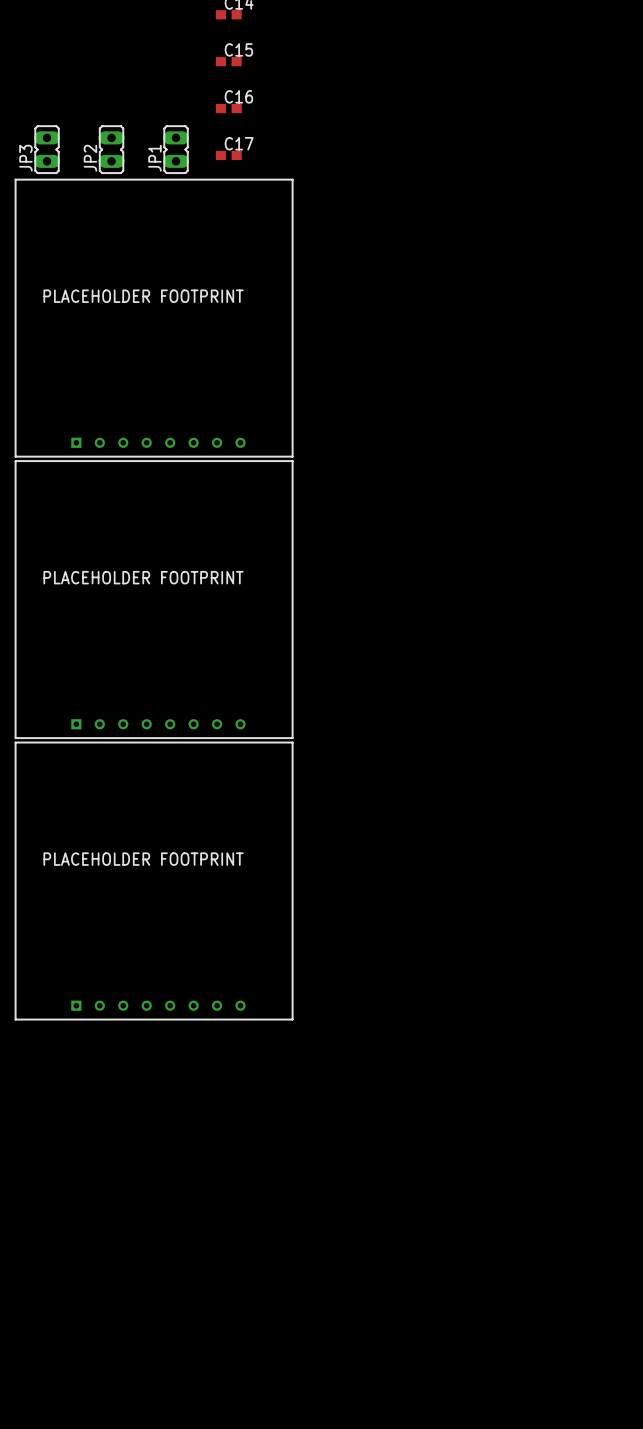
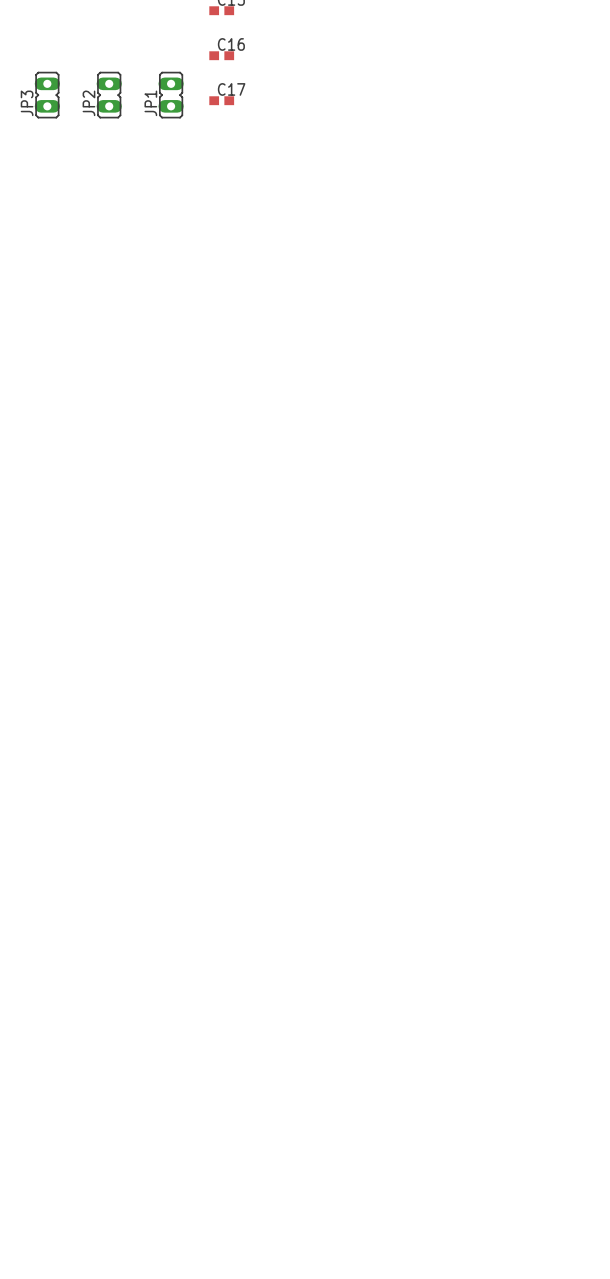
part: (154, 318) -> none
part: (154, 599) -> none
part: (154, 881) -> none

